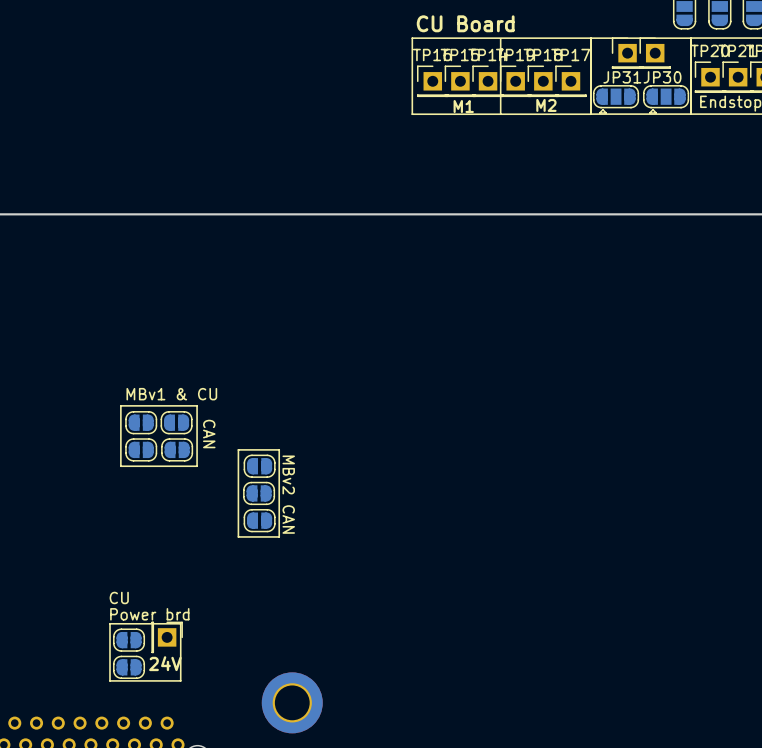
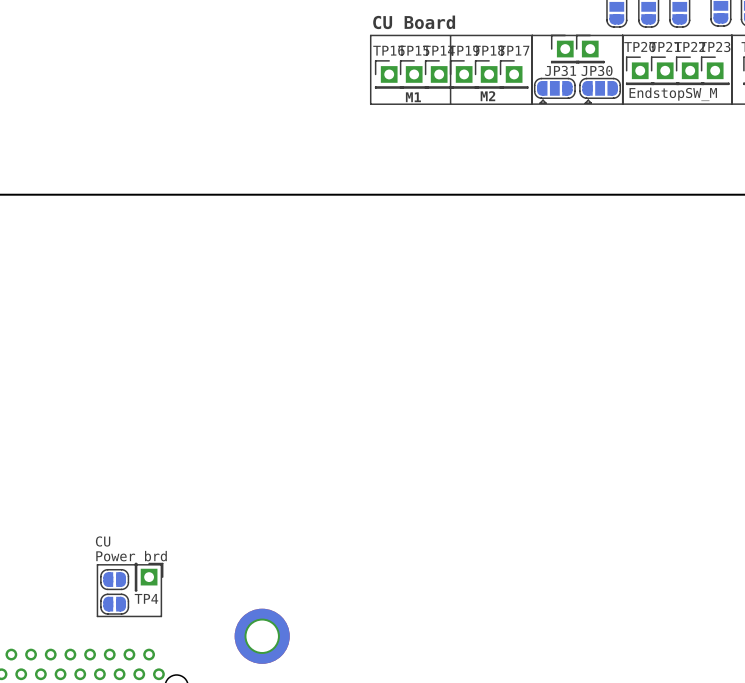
text: MBv1 & CU (171, 394) -> none
line: (197, 405) (120, 405) (120, 466) (197, 466) (197, 405) -> none
part: (141, 422) -> none
part: (176, 422) -> none
text: CAN (209, 434) -> none
part: (141, 449) -> none
part: (177, 449) -> none
line: (279, 449) (238, 449) (238, 536) (279, 536) (279, 449) -> none
part: (259, 466) -> none
part: (259, 493) -> none
text: MBv2 CAN (288, 494) -> none
part: (259, 520) -> none
TP4 name: none -> TP4 (146, 598)
text: 24V (165, 663) -> none

